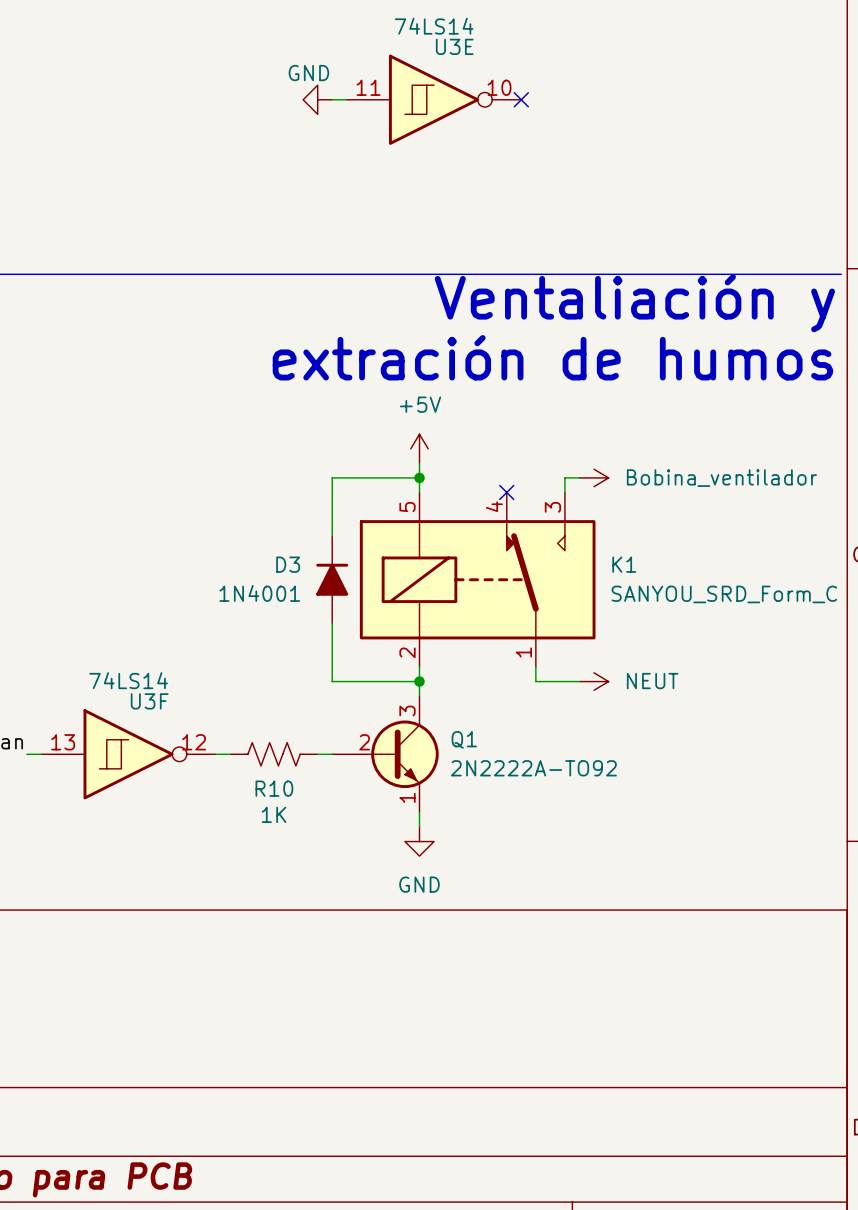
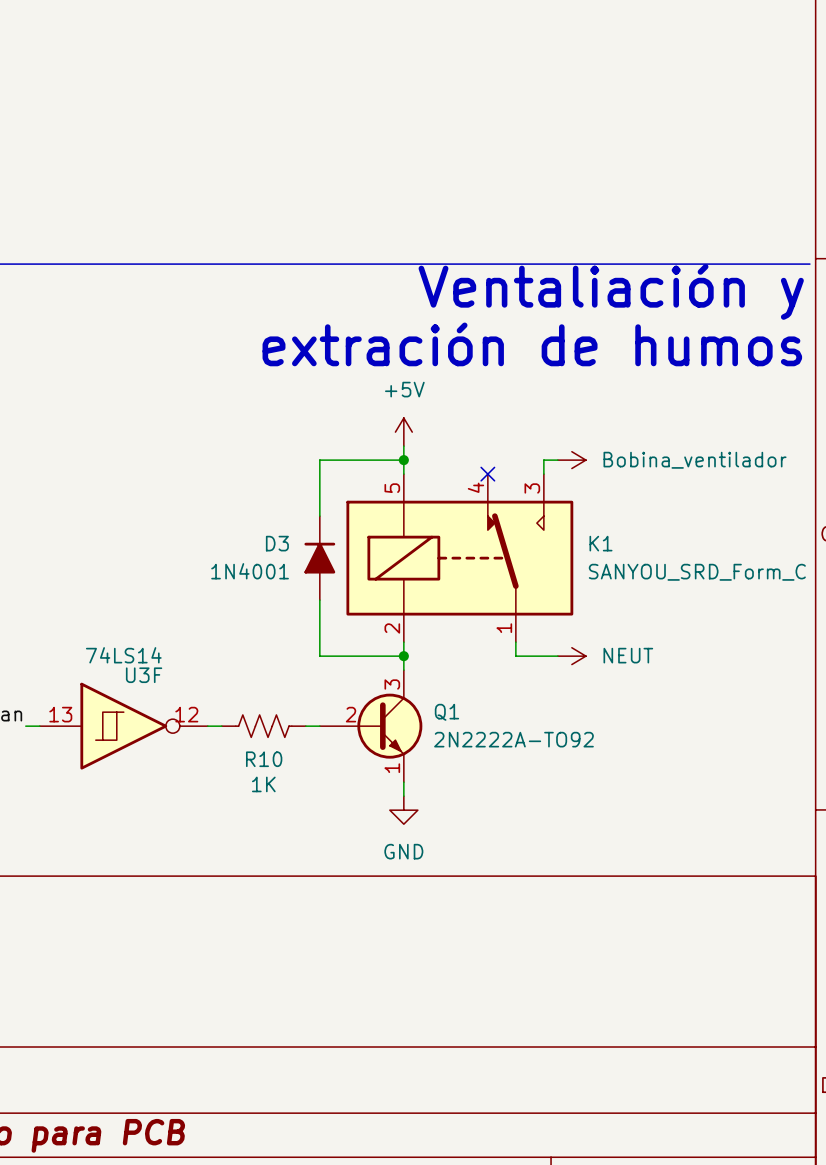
power symbol: GND (317, 99) -> none
wire: (332, 99) (346, 99) -> none
U3E: 74LS14 (434, 99) -> none
no-connect mark: (521, 99) -> none

